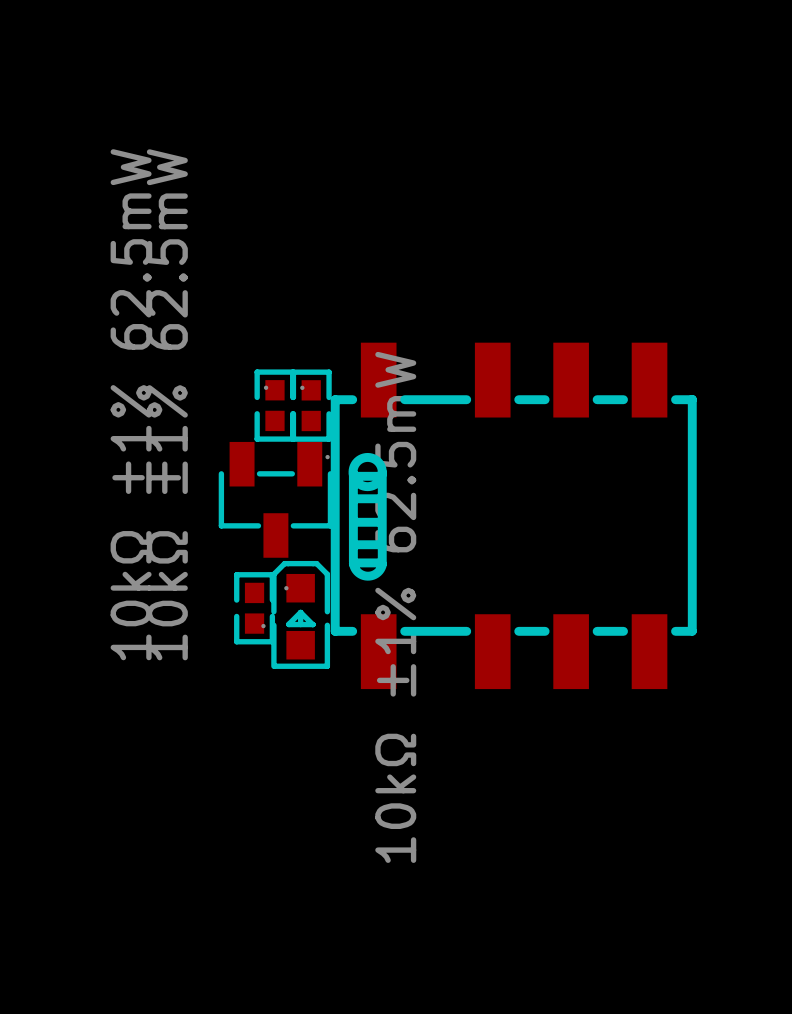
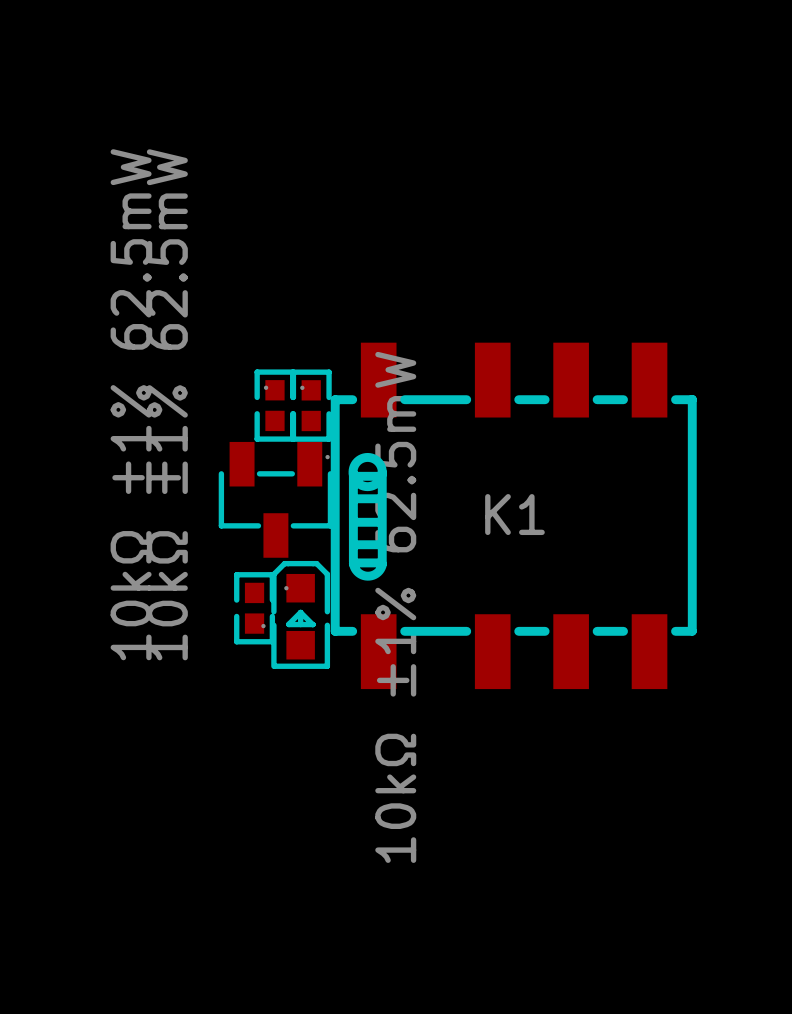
K1 name: none -> K1 (514, 514)

